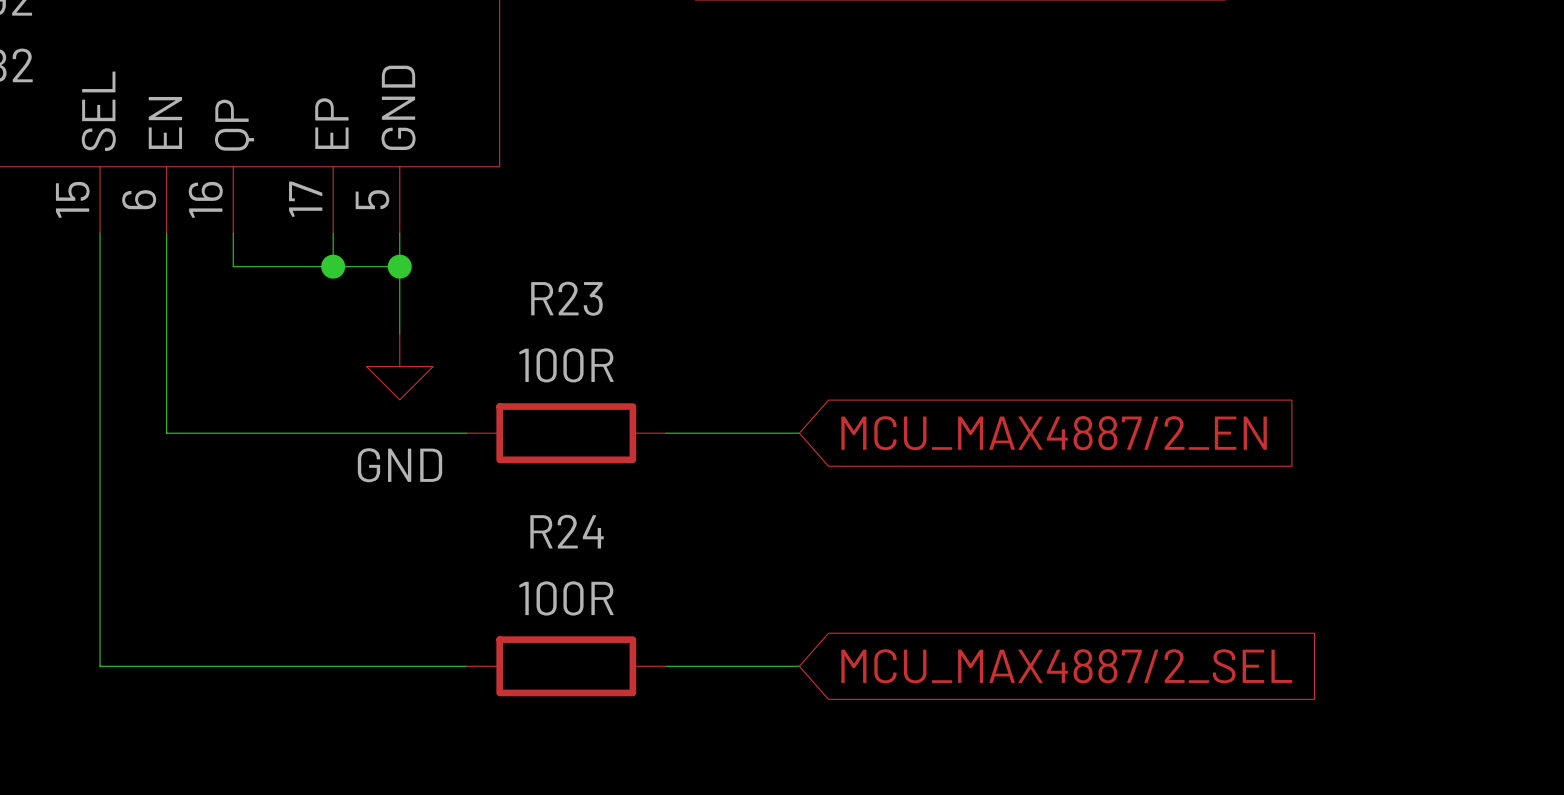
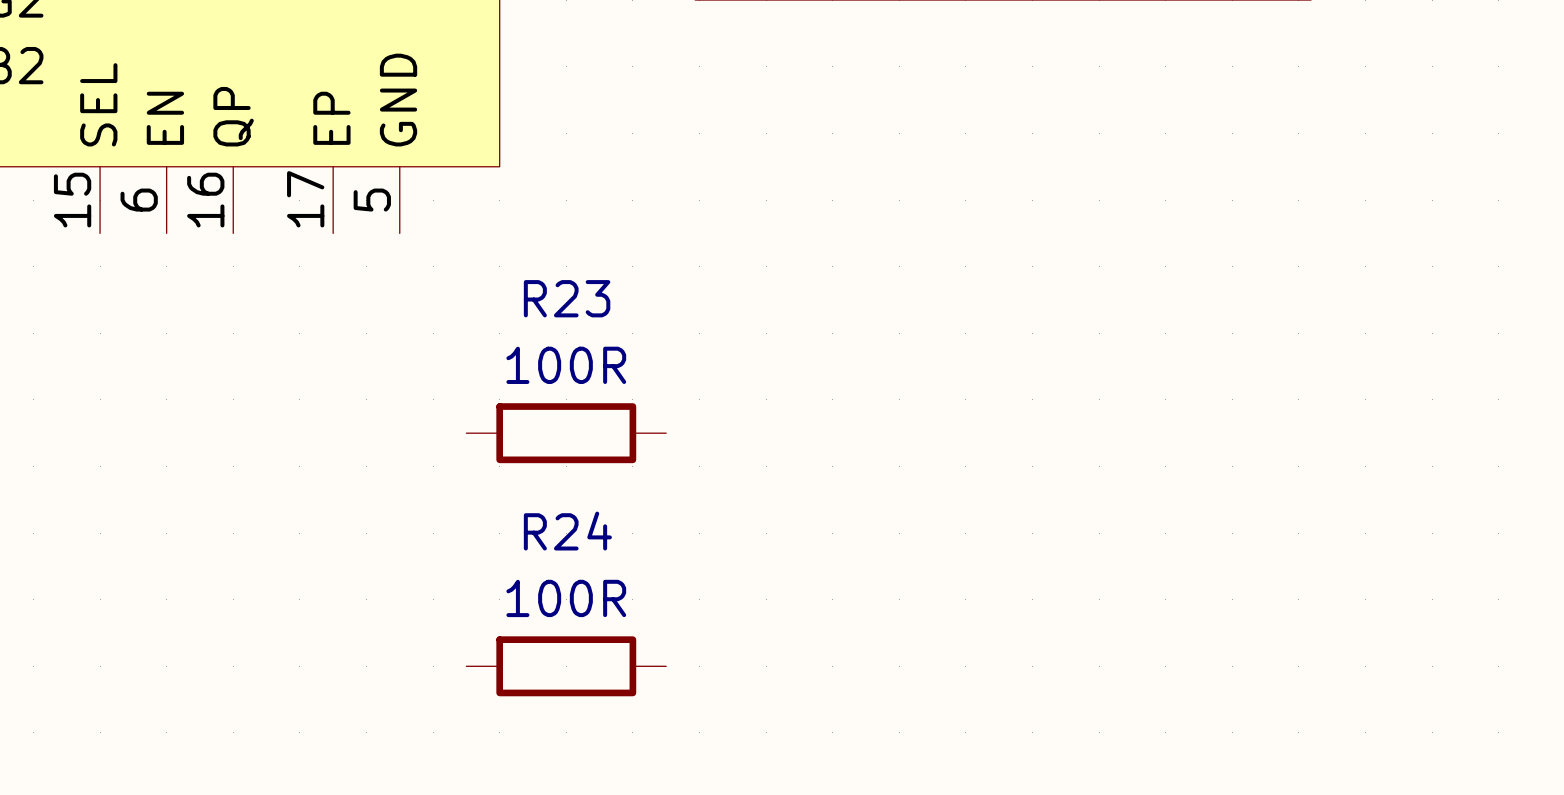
wire: (100, 233) (100, 666) (466, 666) -> none
wire: (166, 233) (166, 433) (466, 433) -> none
wire: (233, 233) (233, 266) (399, 266) -> none
wire: (333, 233) (333, 266) -> none
wire: (399, 233) (399, 333) -> none
junction: (333, 266) -> none
junction: (399, 266) -> none
power symbol: GND (399, 366) -> none
wire: (666, 433) (799, 433) -> none
global label: MCU_MAX4887/2_EN (1054, 433) -> none
wire: (666, 666) (799, 666) -> none
global label: MCU_MAX4887/2_SEL (1066, 666) -> none

